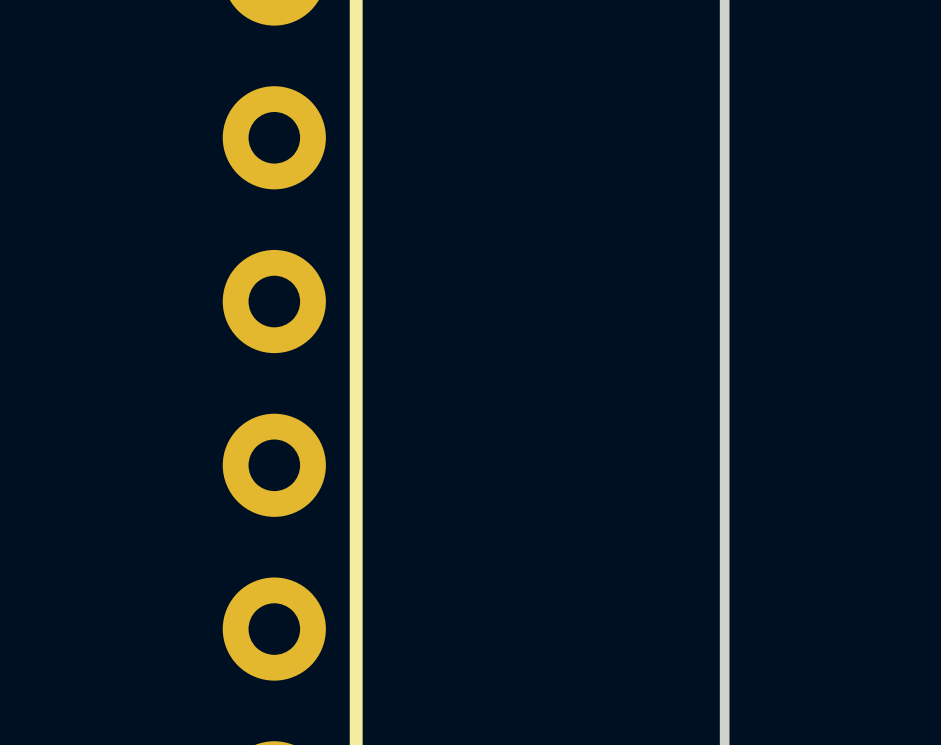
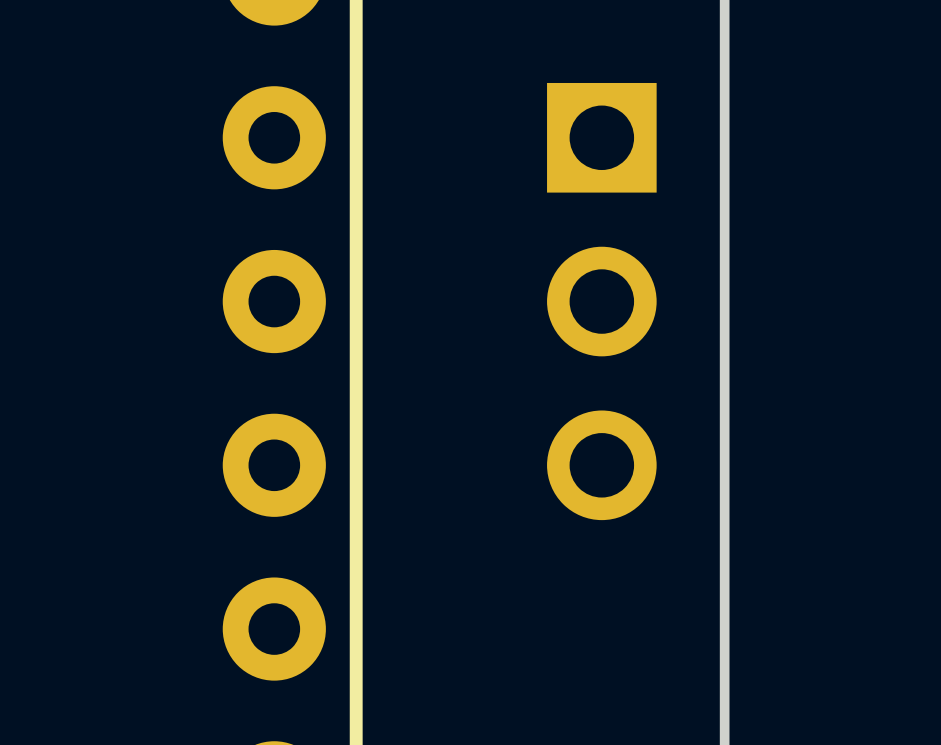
part: none -> (601, 301)

